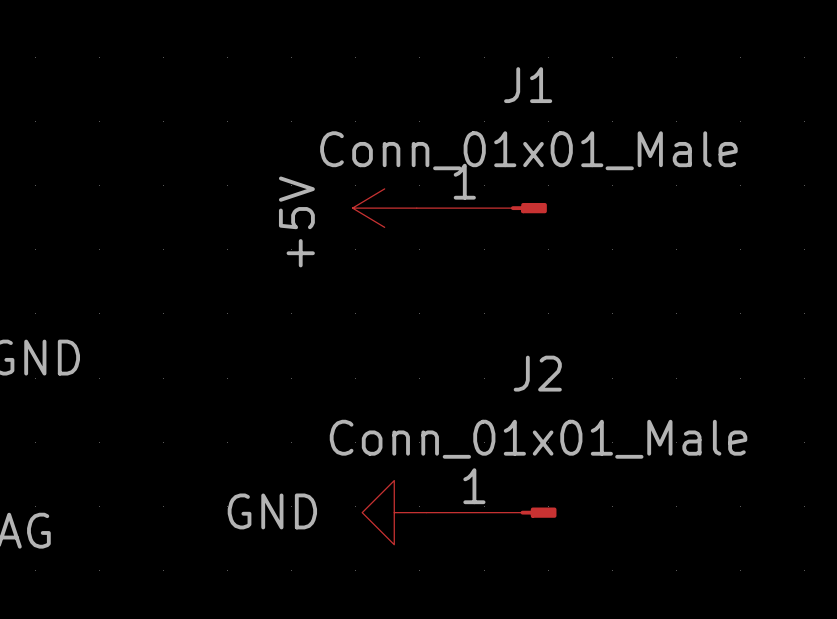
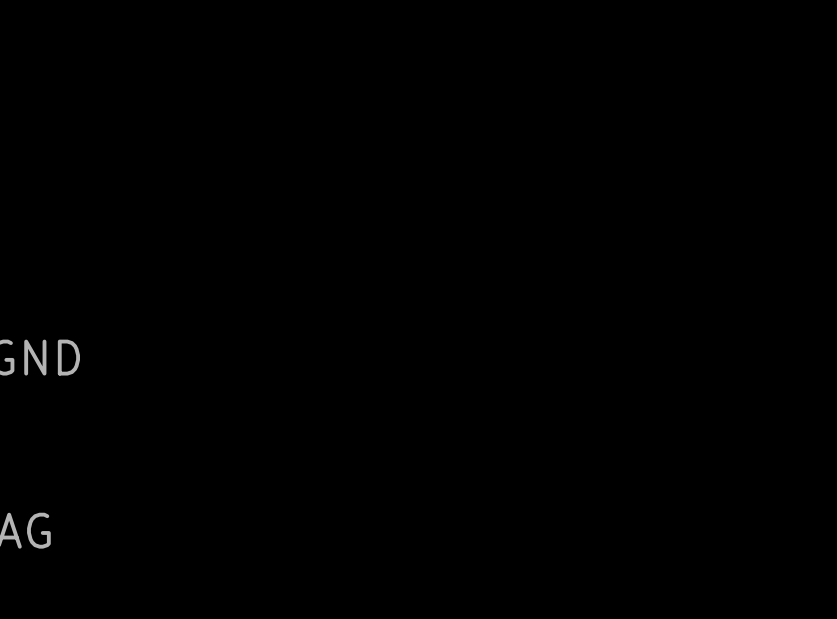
power symbol: +5V (384, 208) -> none
J1: Conn_01x01_Male (481, 208) -> none
power symbol: GND (394, 512) -> none
J2: Conn_01x01_Male (491, 512) -> none

